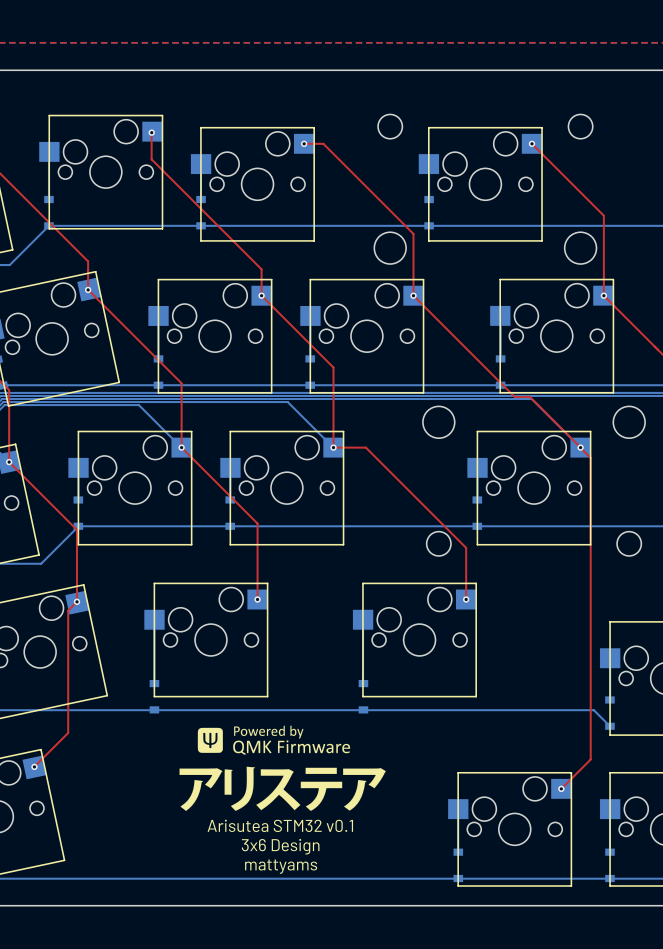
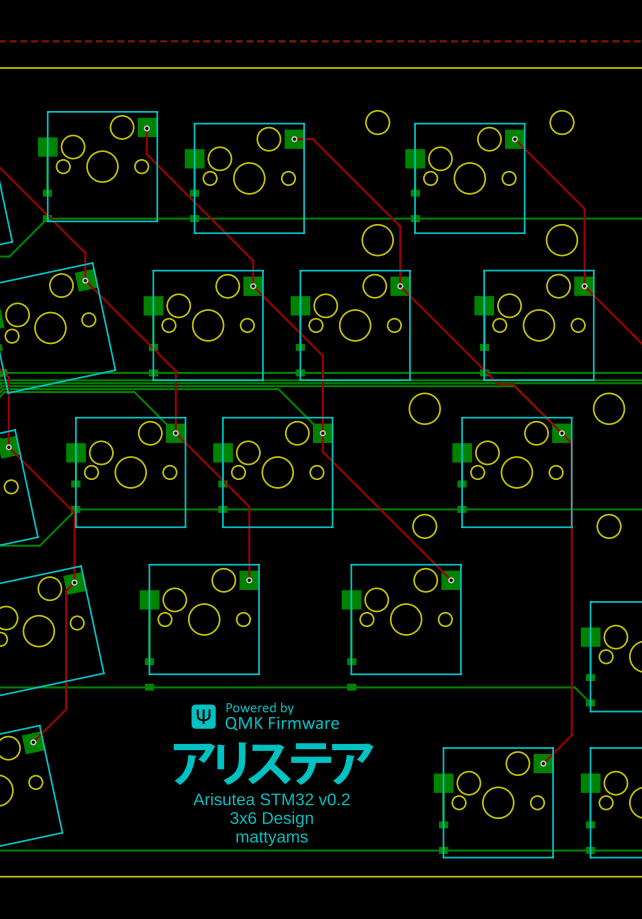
top track: (333, 447) (365, 447) (466, 547) (466, 599) -> (322, 433) (322, 451) (451, 580)
text: Arisutea STM32 v0.1 (280, 825) -> Arisutea STM32 v0.2 (271, 799)

